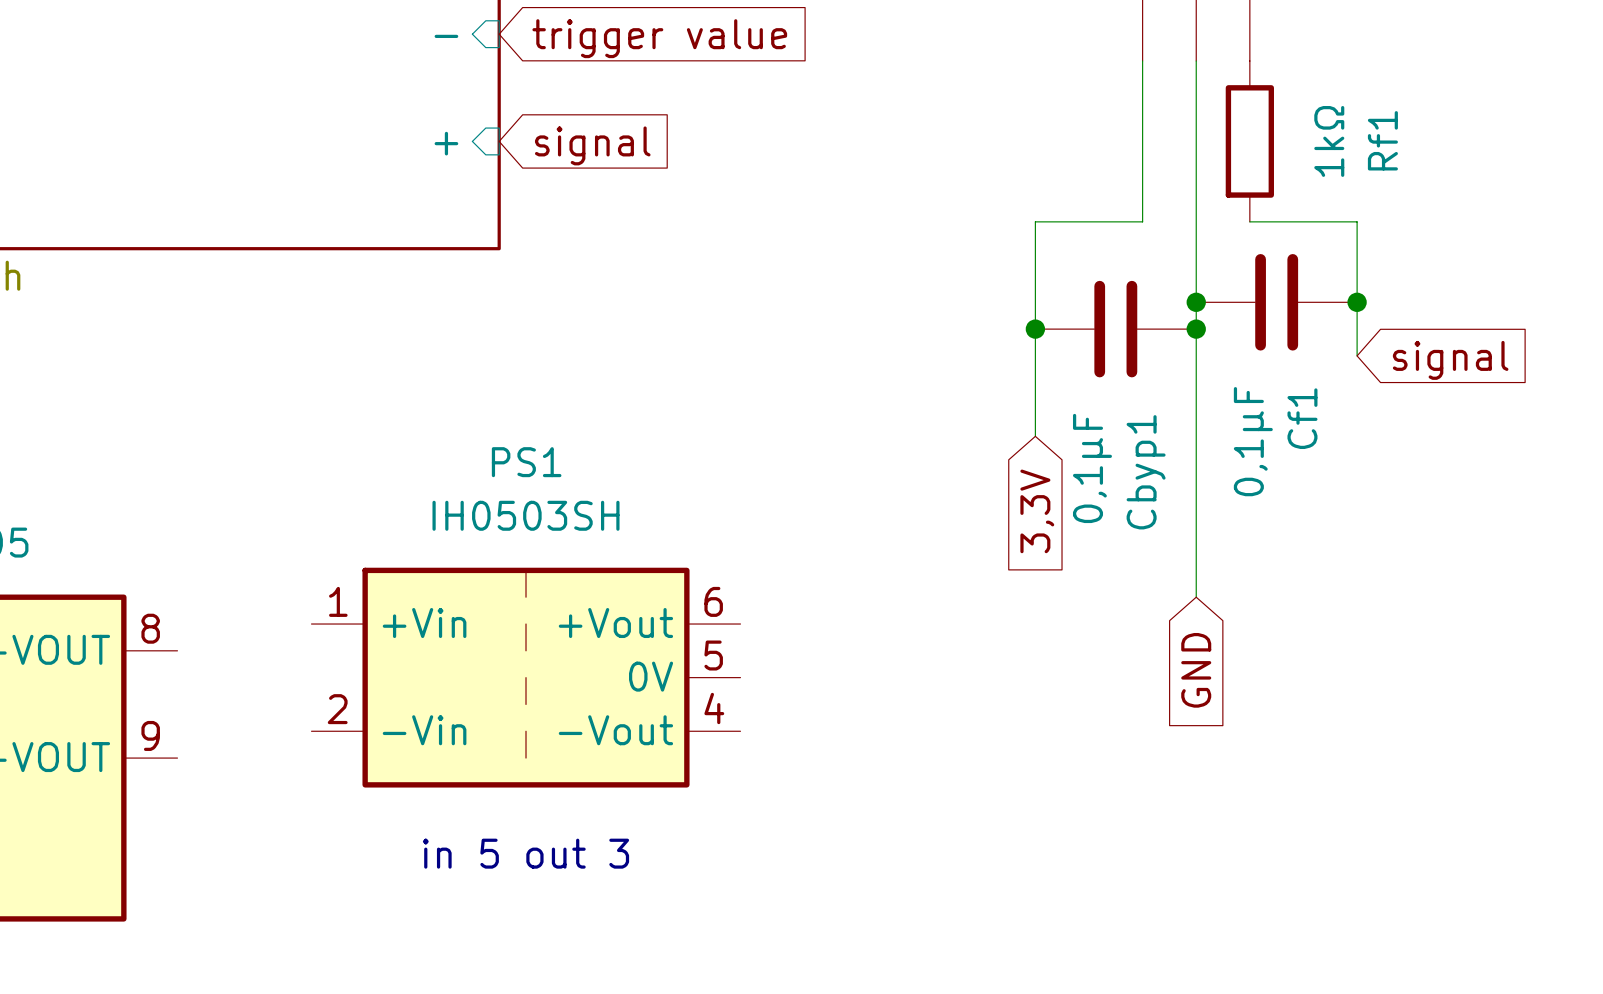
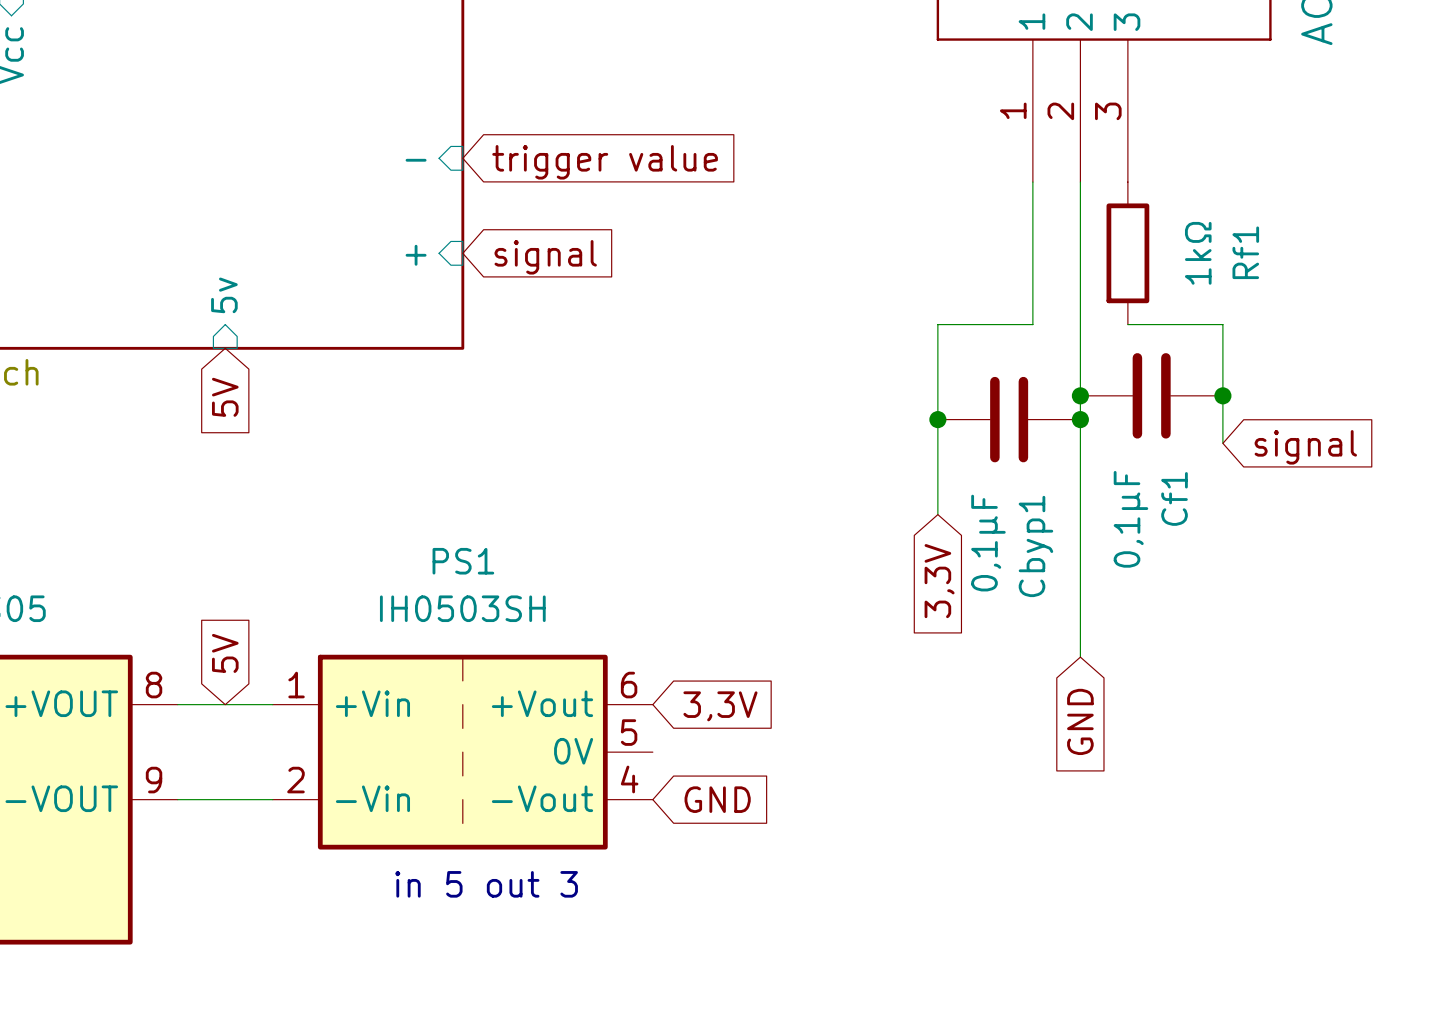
sheet pin: none -> 5v (224, 295)
global label: none -> 5V (225, 397)
global label: none -> 5V (225, 653)
wire: none -> (177, 704) (272, 704)
global label: none -> 3,3V (720, 706)
PS1 position: (526, 677) -> (462, 752)
wire: none -> (177, 799) (272, 799)
global label: none -> GND (717, 799)

